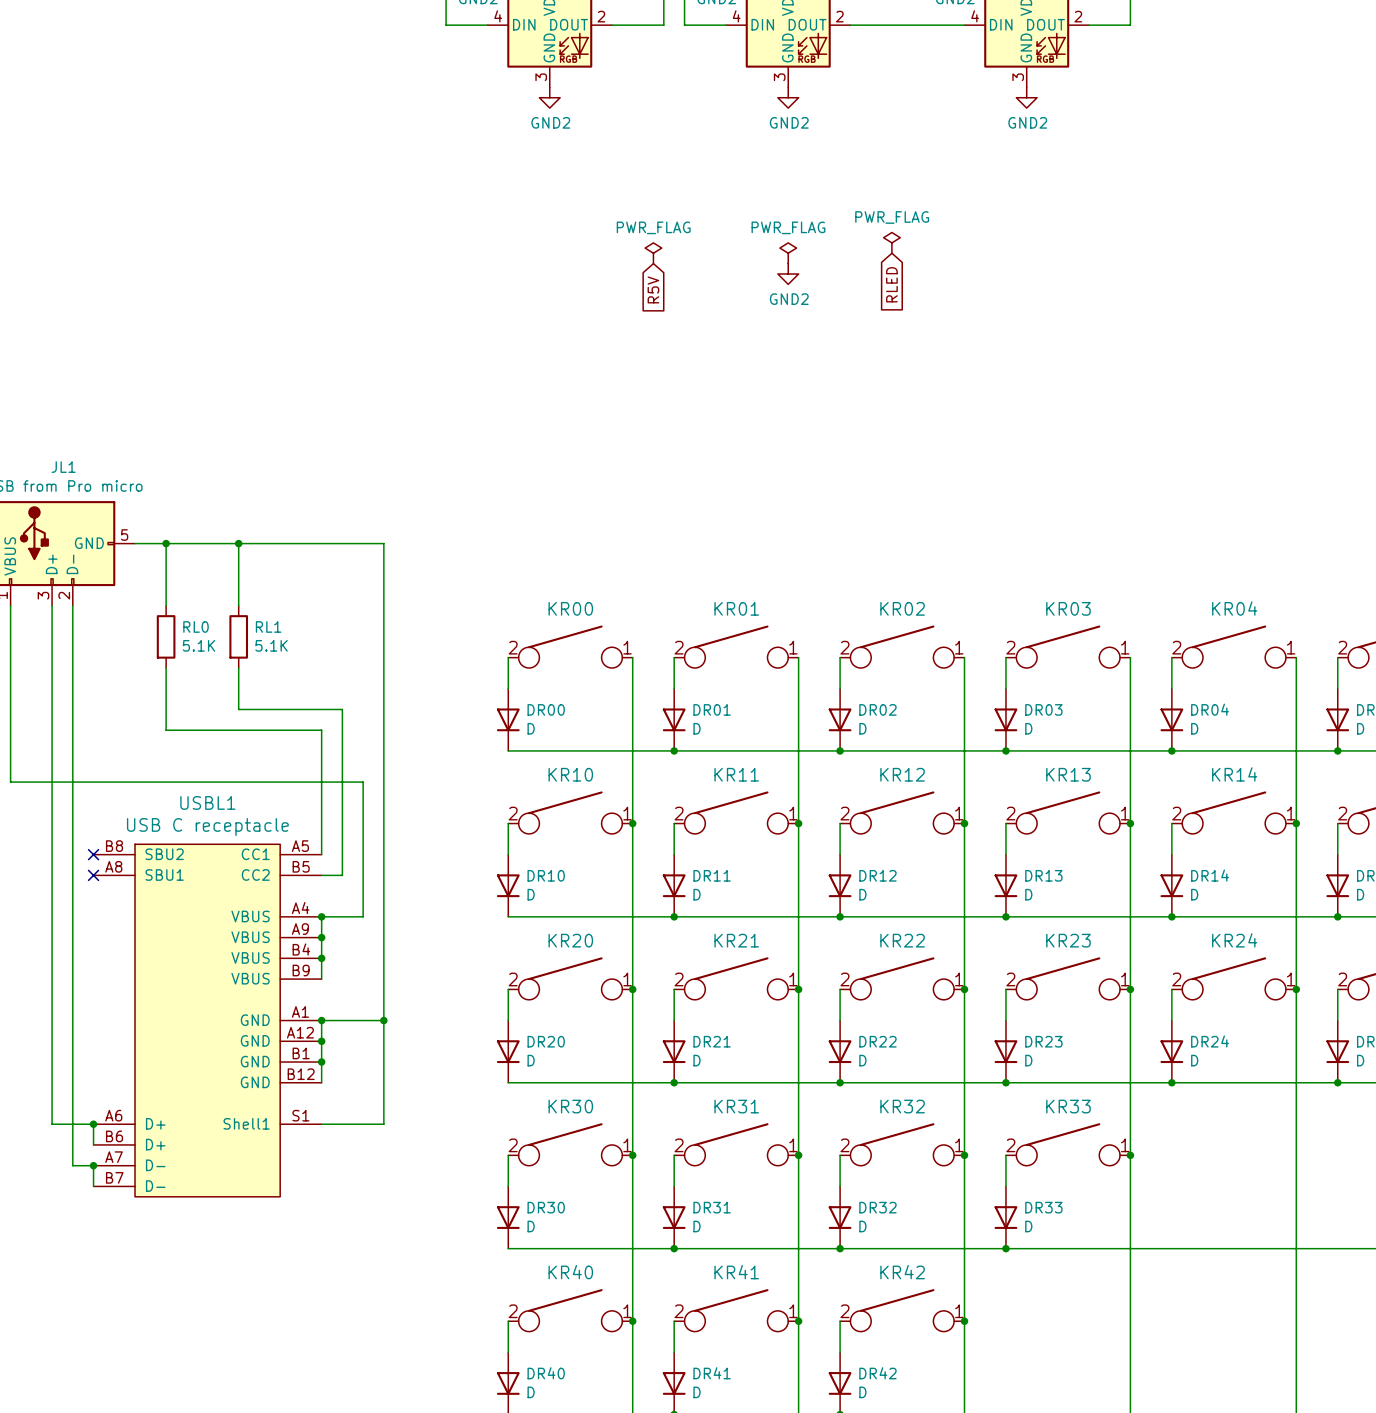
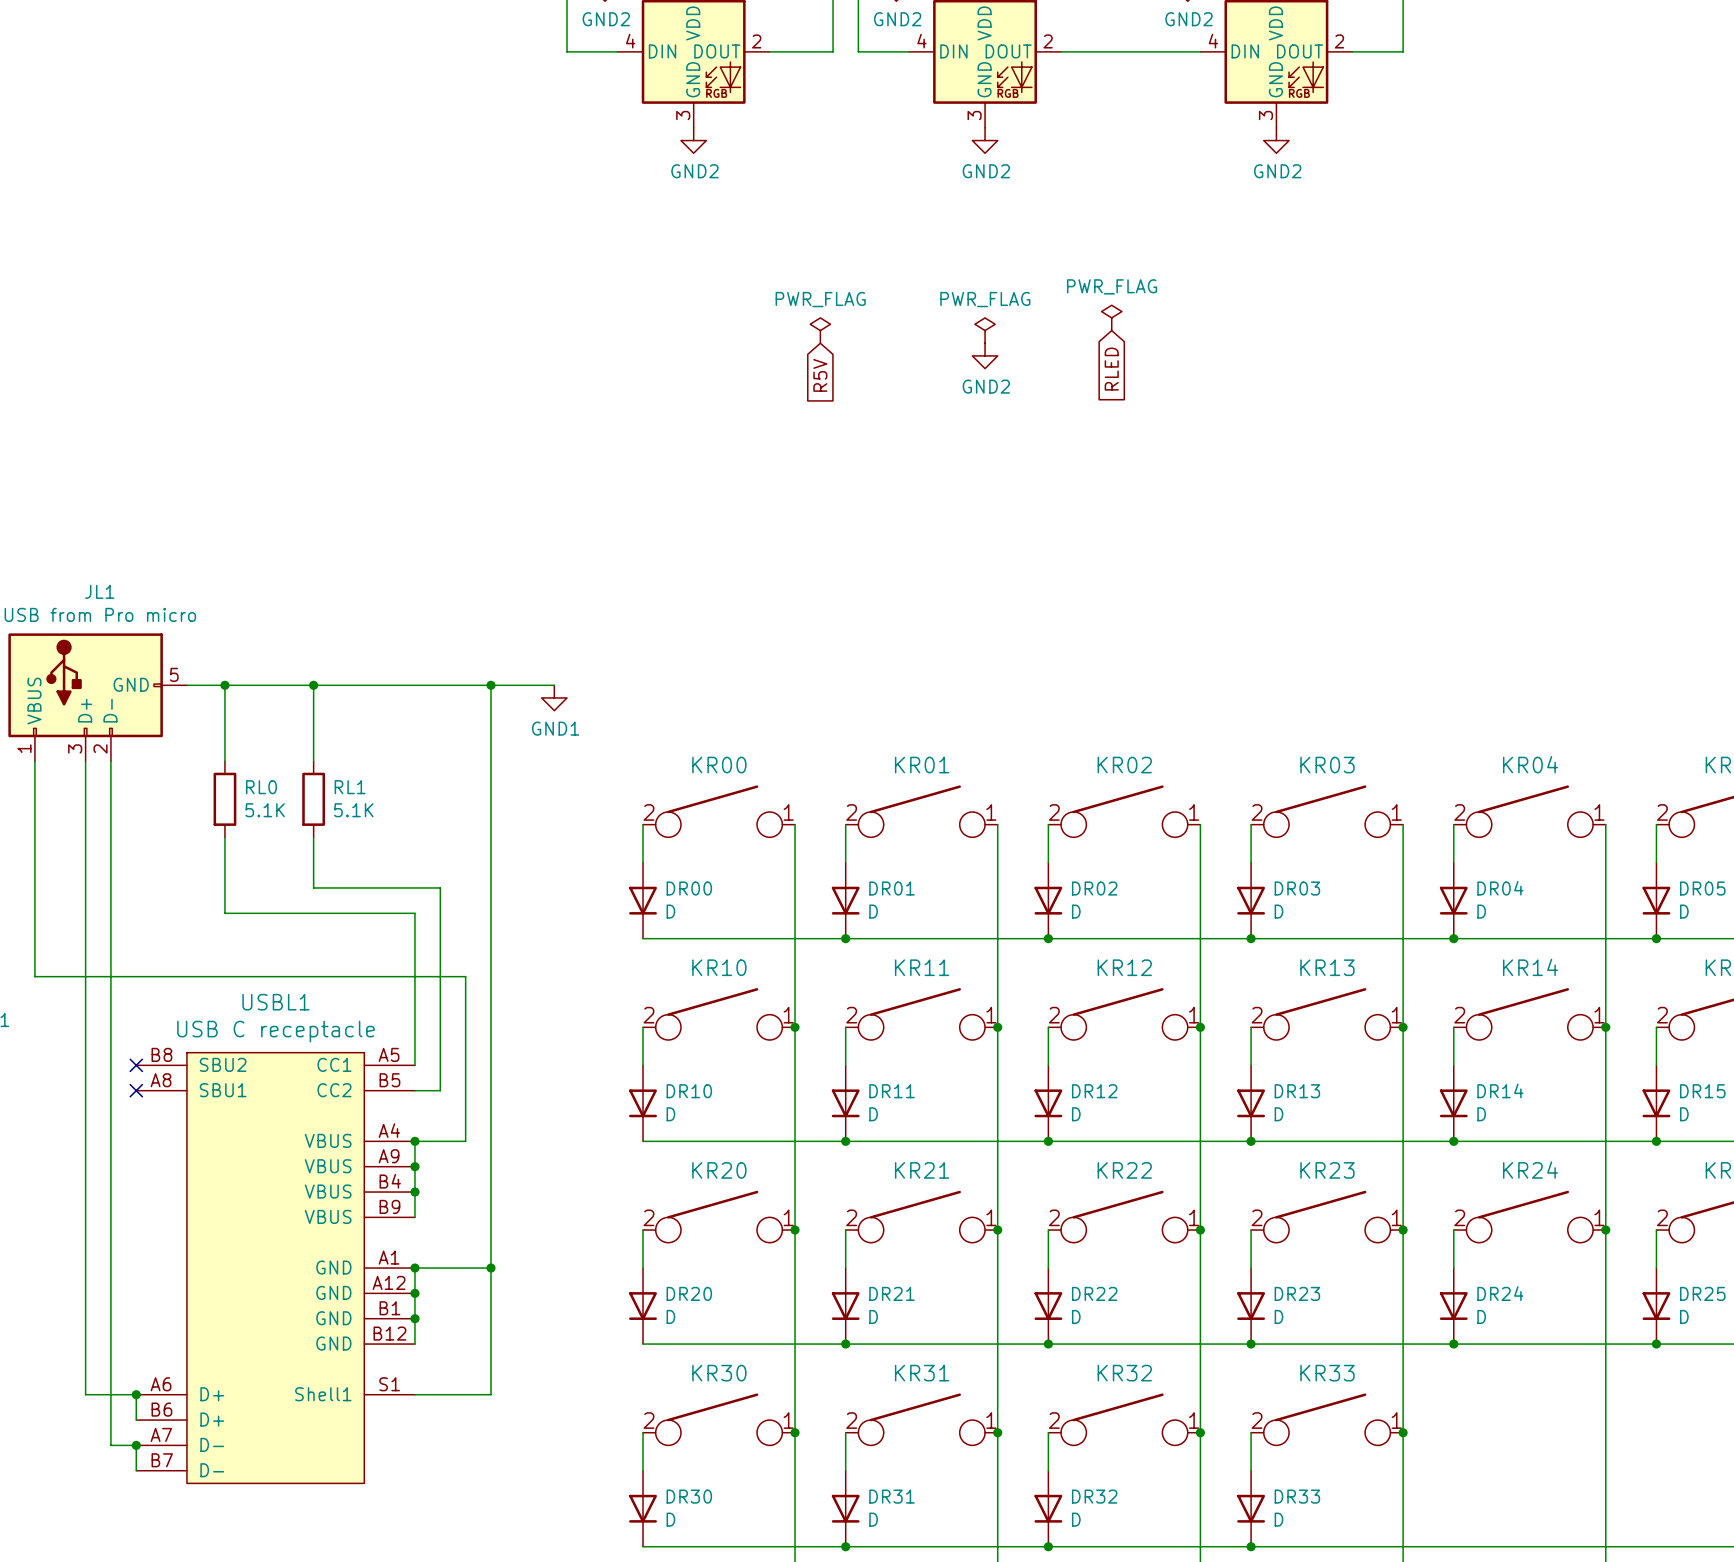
wire: none -> (490, 685) (554, 685)
junction: none -> (490, 685)
power symbol: none -> GND1 (554, 697)

